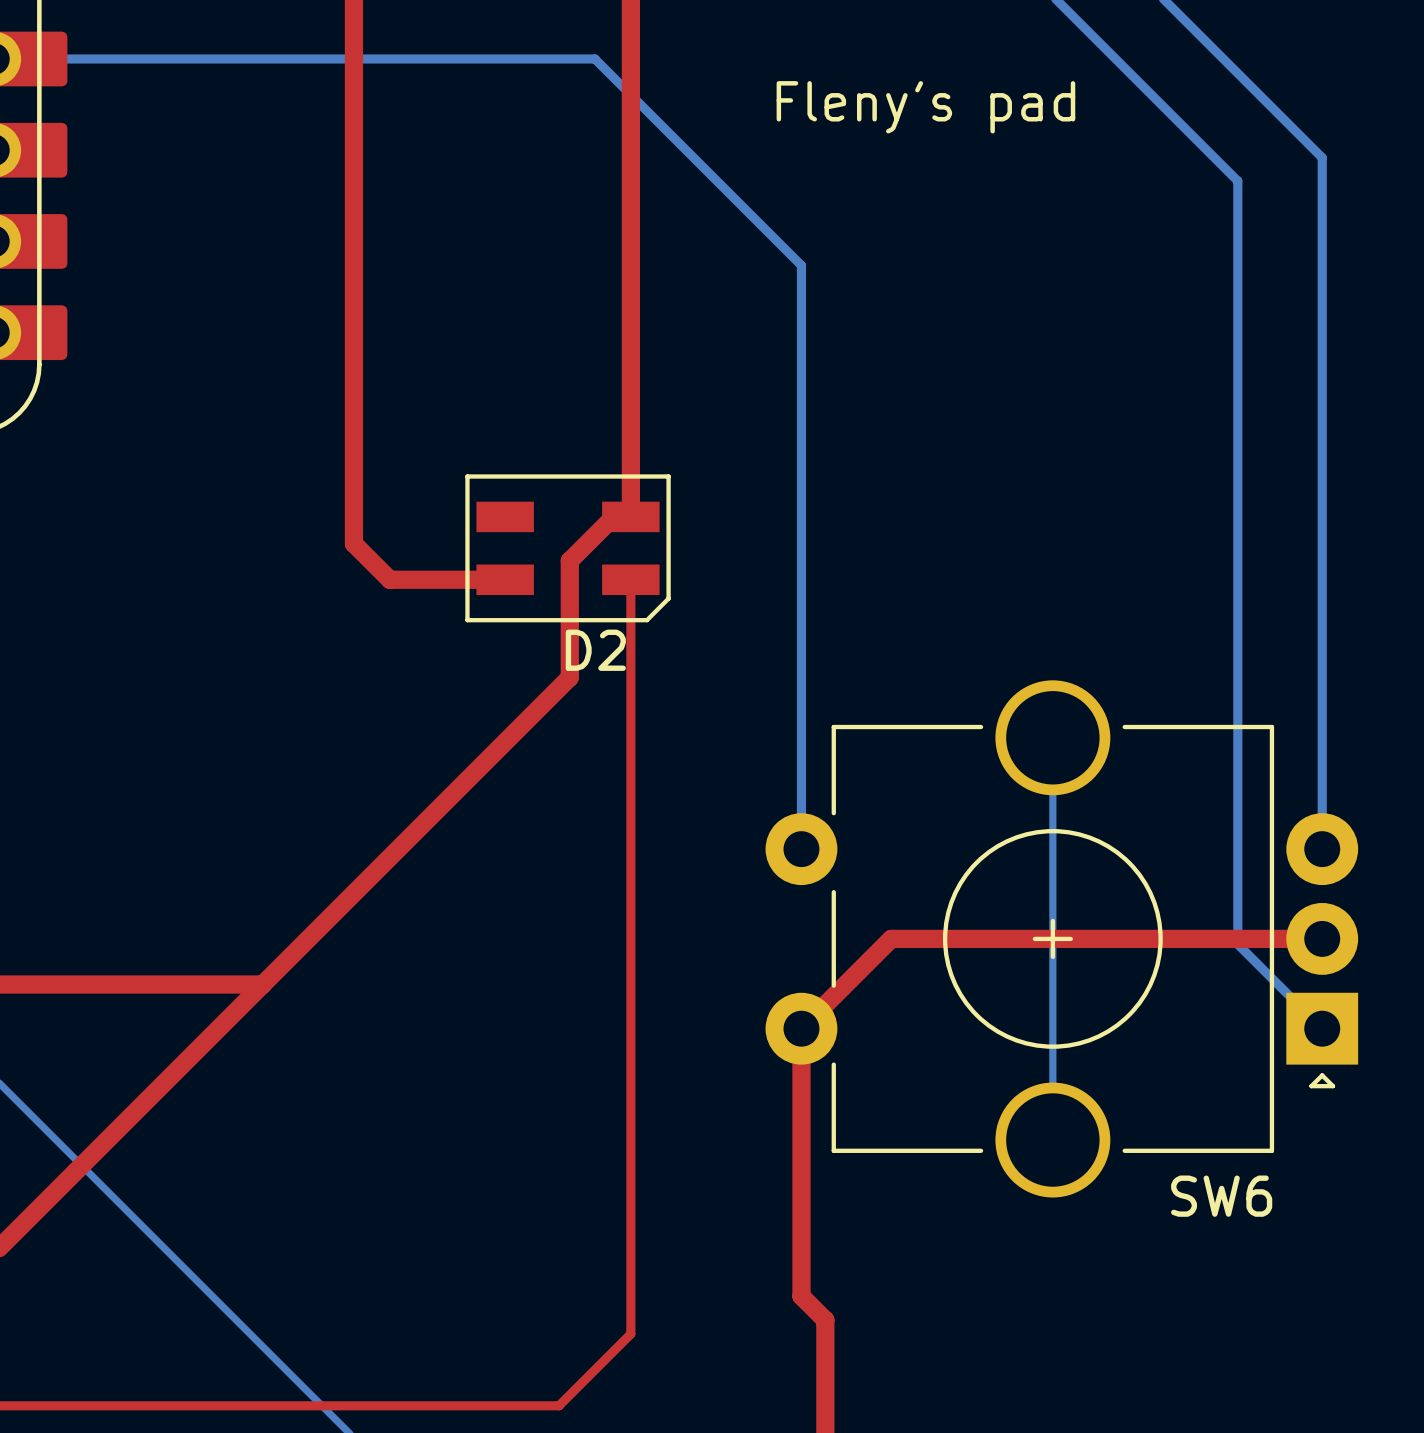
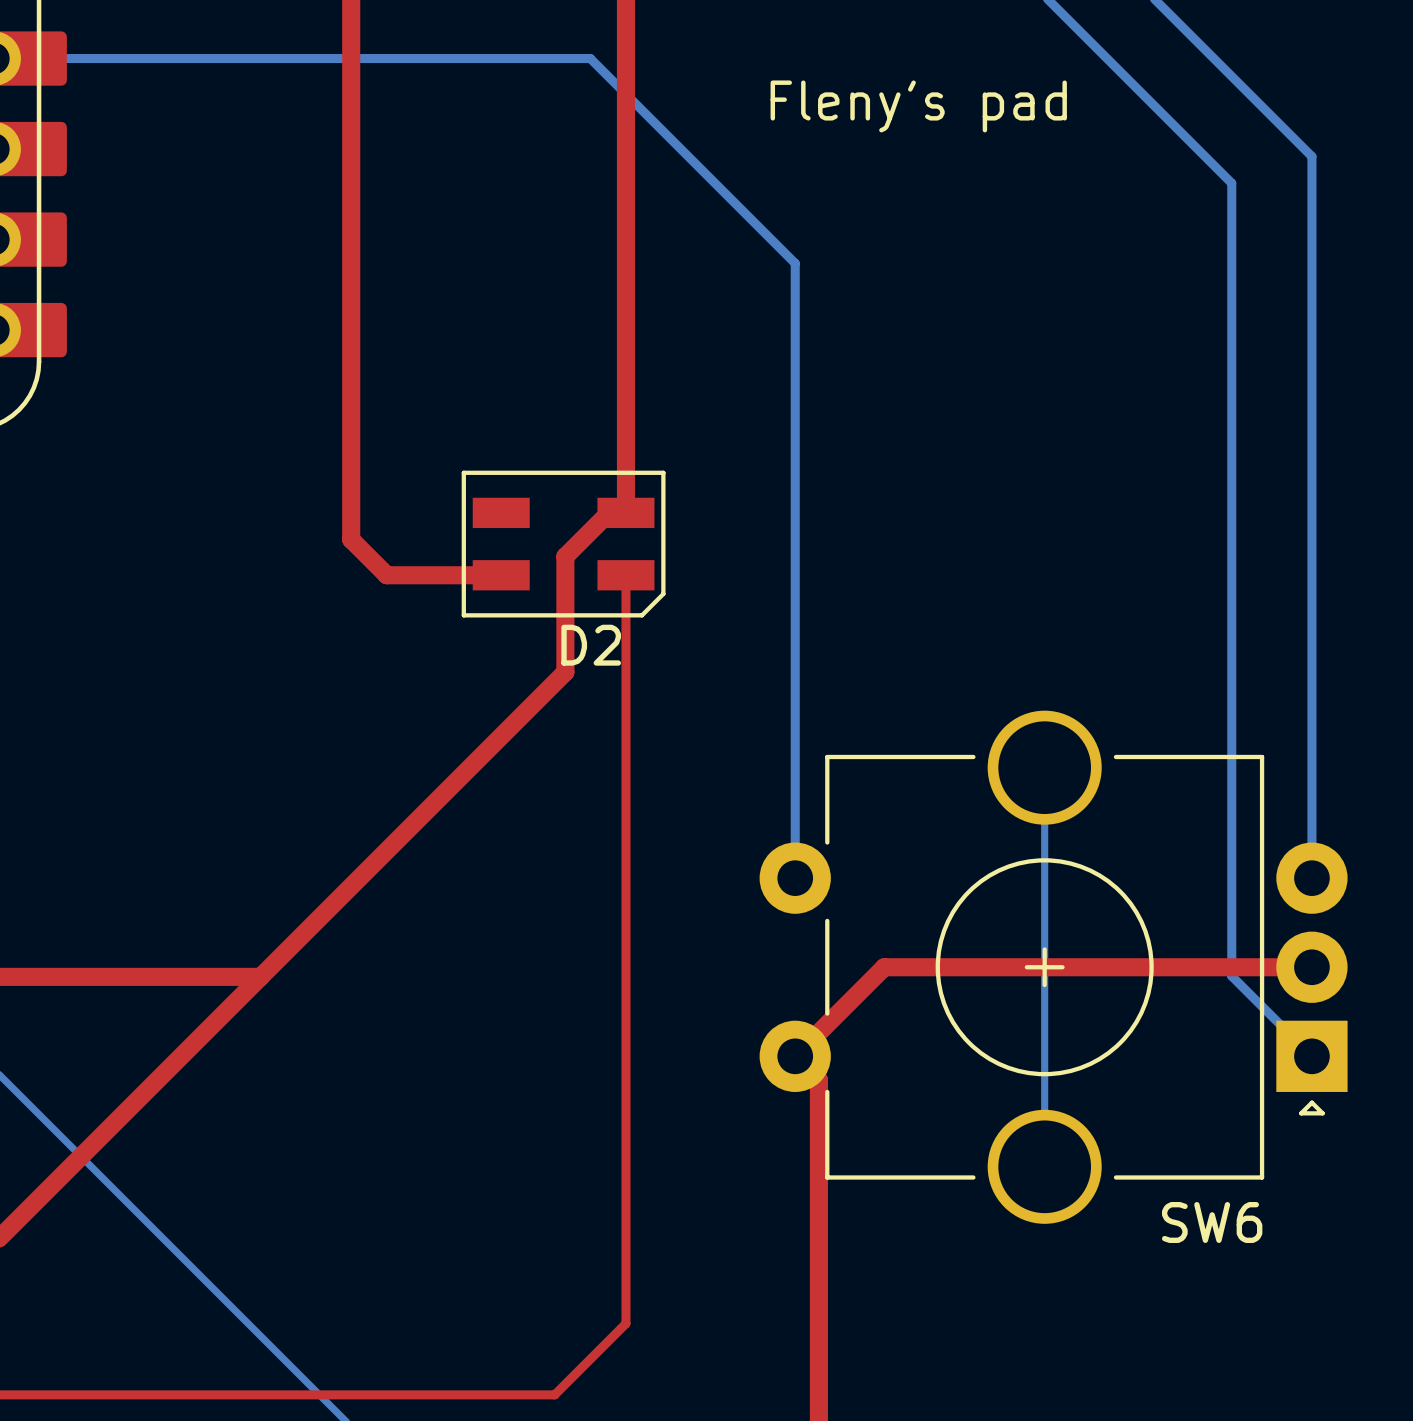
bottom track: (1237, 181) (1237, 944) (1322, 1028) -> (1228, 179) (1231, 183) (1231, 976) (1311, 1056)
SW6 position: (1061, 938) -> (1053, 967)
top track: (1322, 938) (891, 938) (801, 1028) (801, 1296) (825, 1320) -> (1311, 967) (884, 967) (795, 1056) (818, 1080) (818, 1309)

